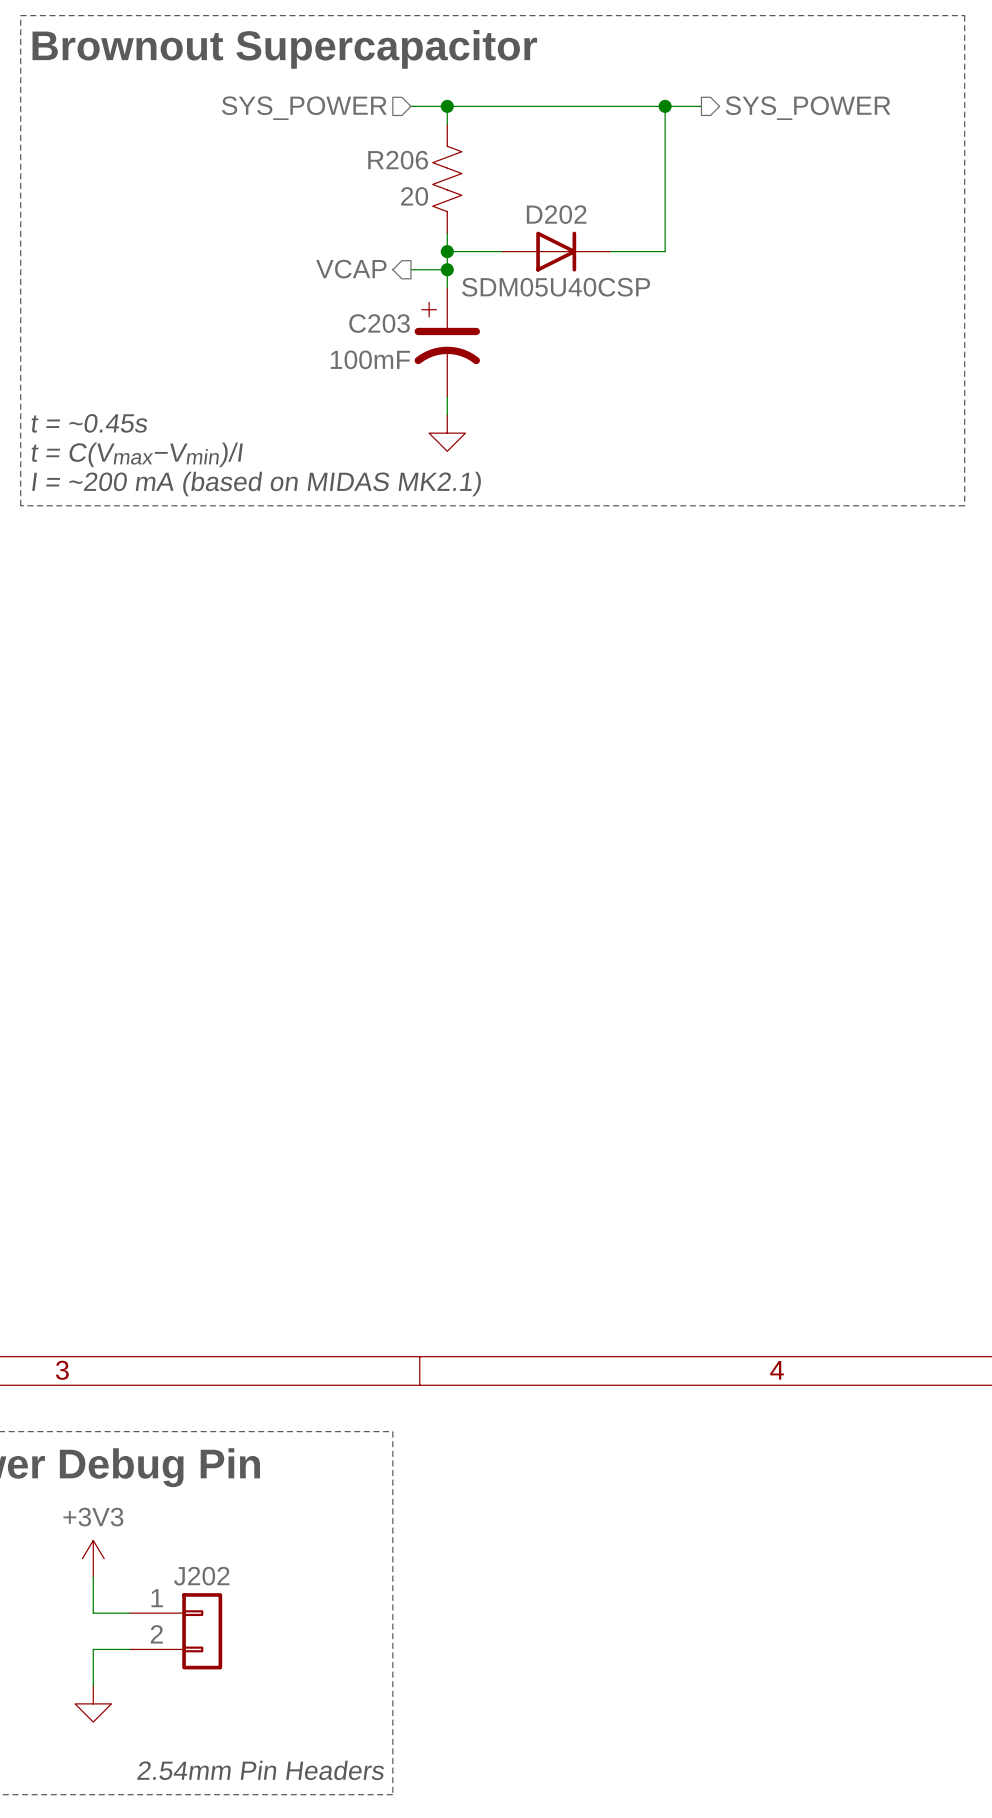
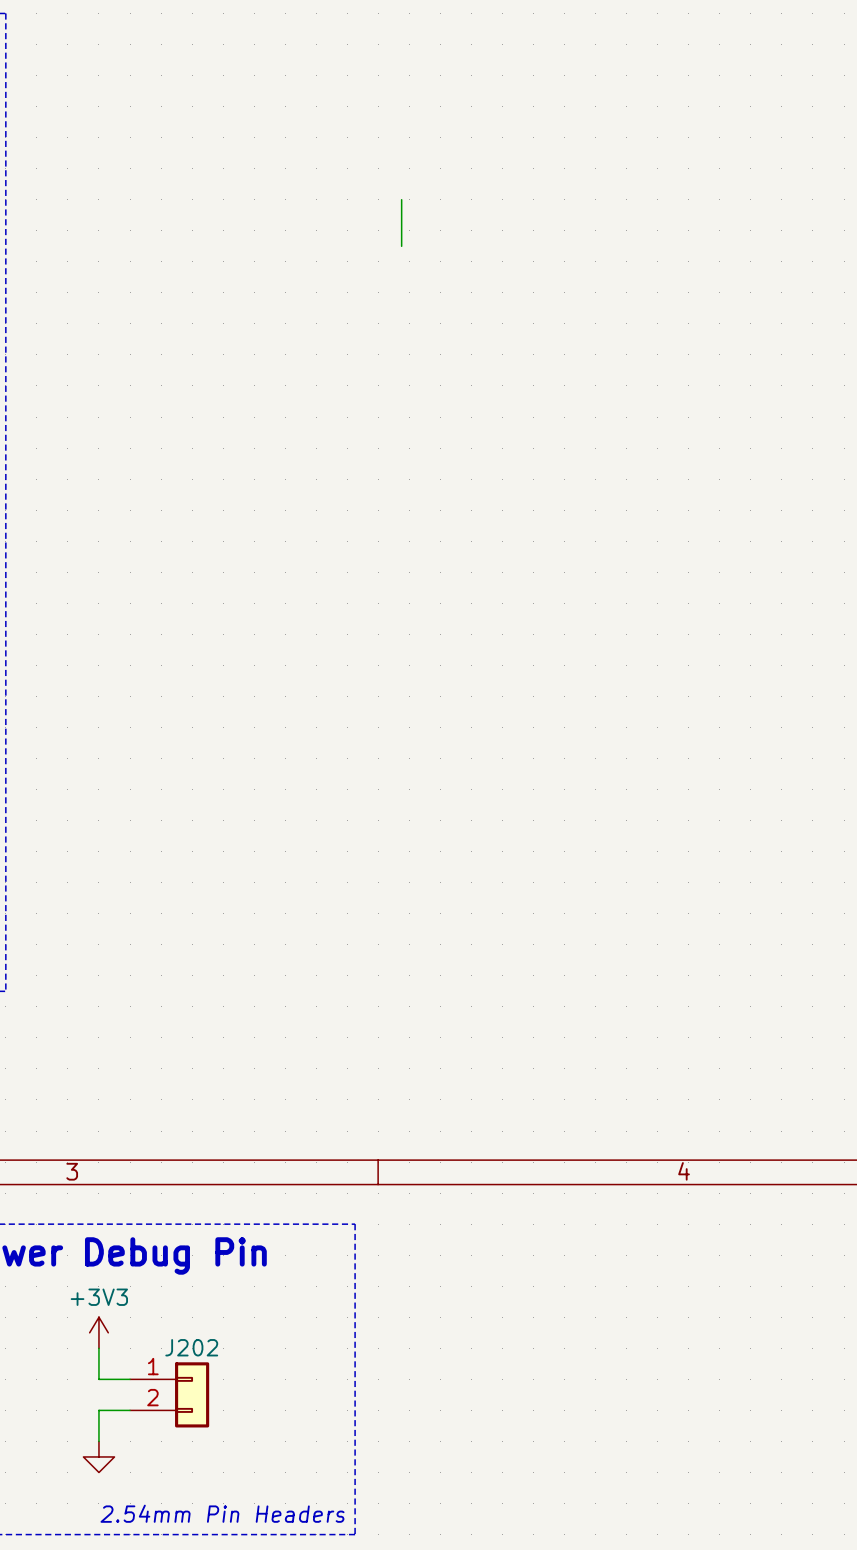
line: (20, 15) (964, 15) (964, 505) (20, 505) (20, 15) -> none
text: Brownout Supercapacitor (284, 49) -> none
wire: (410, 106) (701, 106) -> none
wire: (447, 106) (447, 124) -> none
junction: (447, 106) -> none
wire: (665, 106) (665, 251) (610, 251) -> none
junction: (665, 106) -> none
hierarchical label: SYS_POWER (304, 108) -> none
hierarchical label: SYS_POWER (808, 108) -> none
R206: 20 (447, 178) -> none
wire: (447, 251) (501, 251) -> none
junction: (447, 251) -> none
D202: SDM05U40CSP (556, 251) -> none
hierarchical label: VCAP (351, 269) -> none
wire: (410, 269) (447, 269) -> none
junction: (447, 269) -> none
C203: 100mF (447, 342) -> none
wire: (447, 396) (447, 414) -> none
text: t = ~0.45s (89, 423) -> none
power symbol: (447, 433) -> none
text: t = C(Vmax−Vmin)/I (137, 454) -> none
text: I = ~200 mA (based on MIDAS MK2.1) (256, 484) -> none

